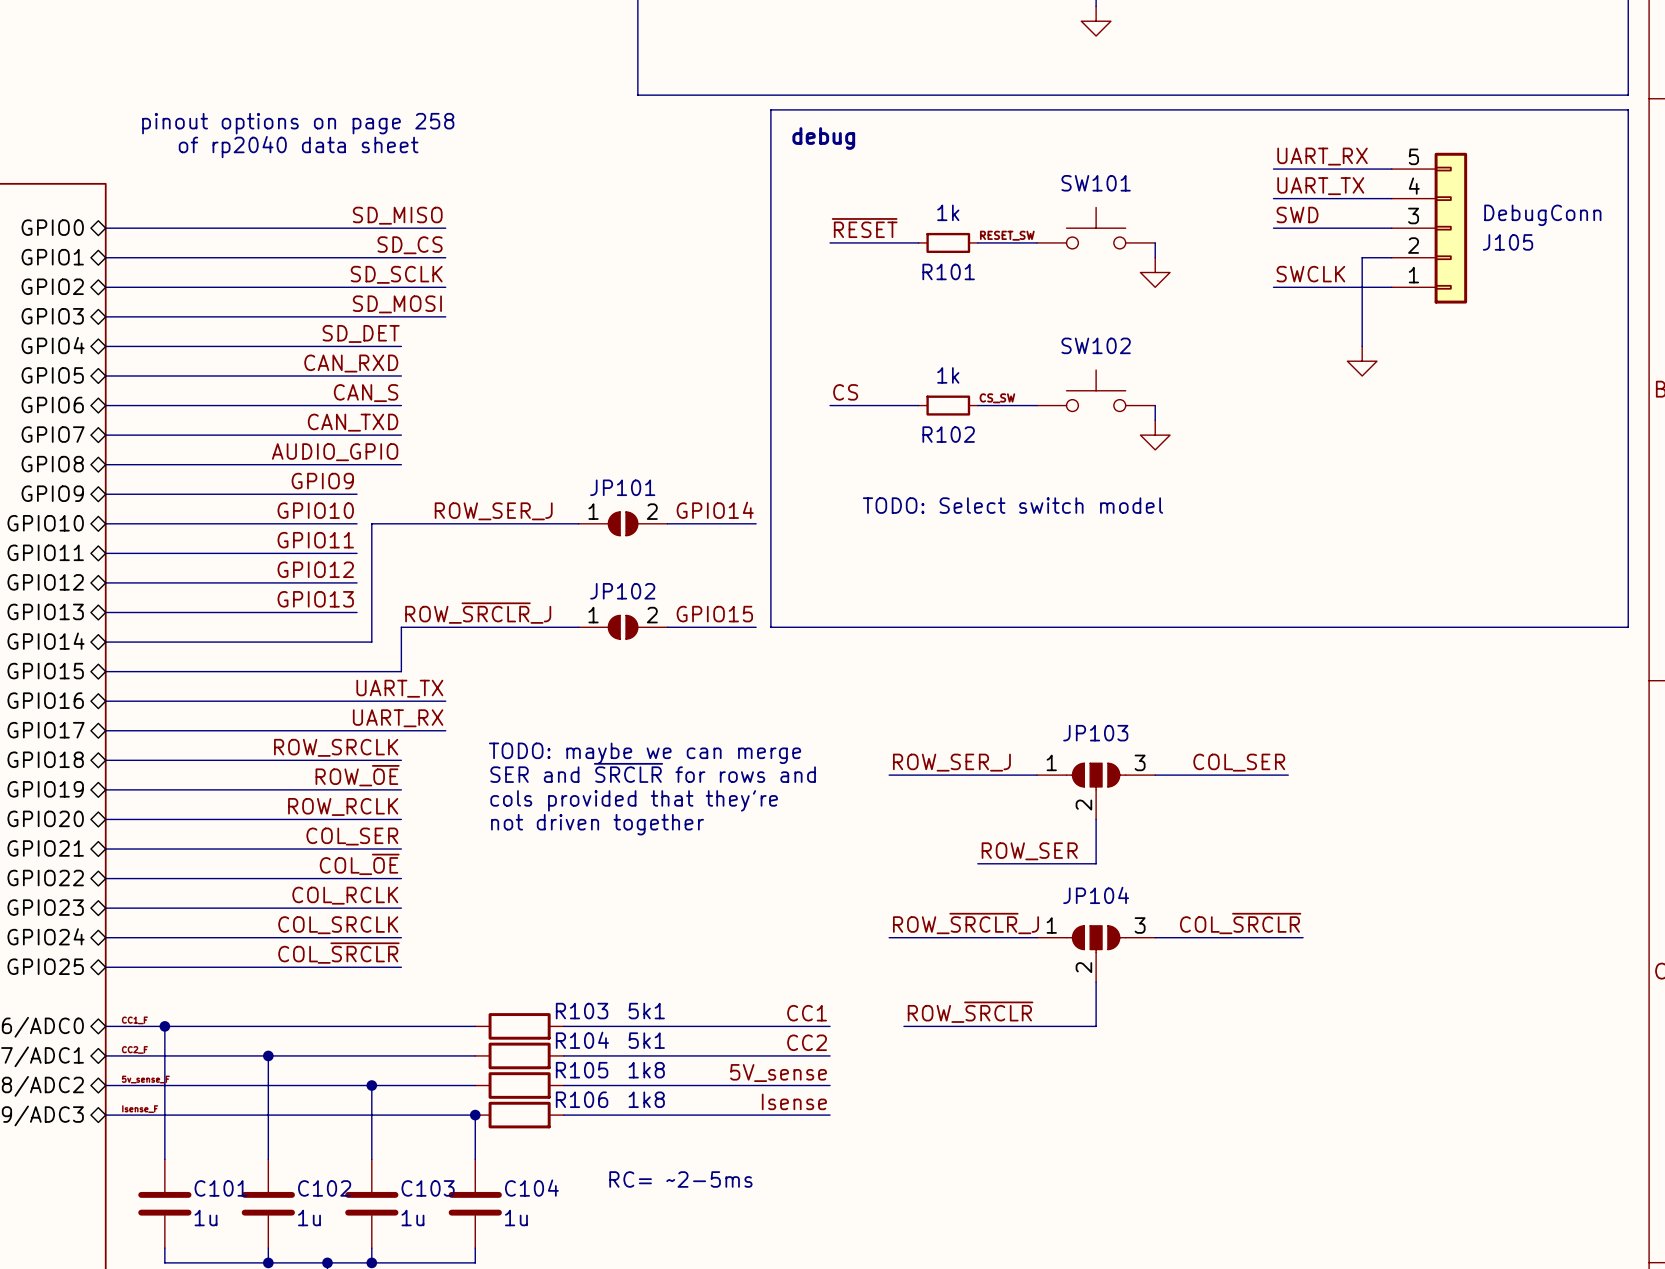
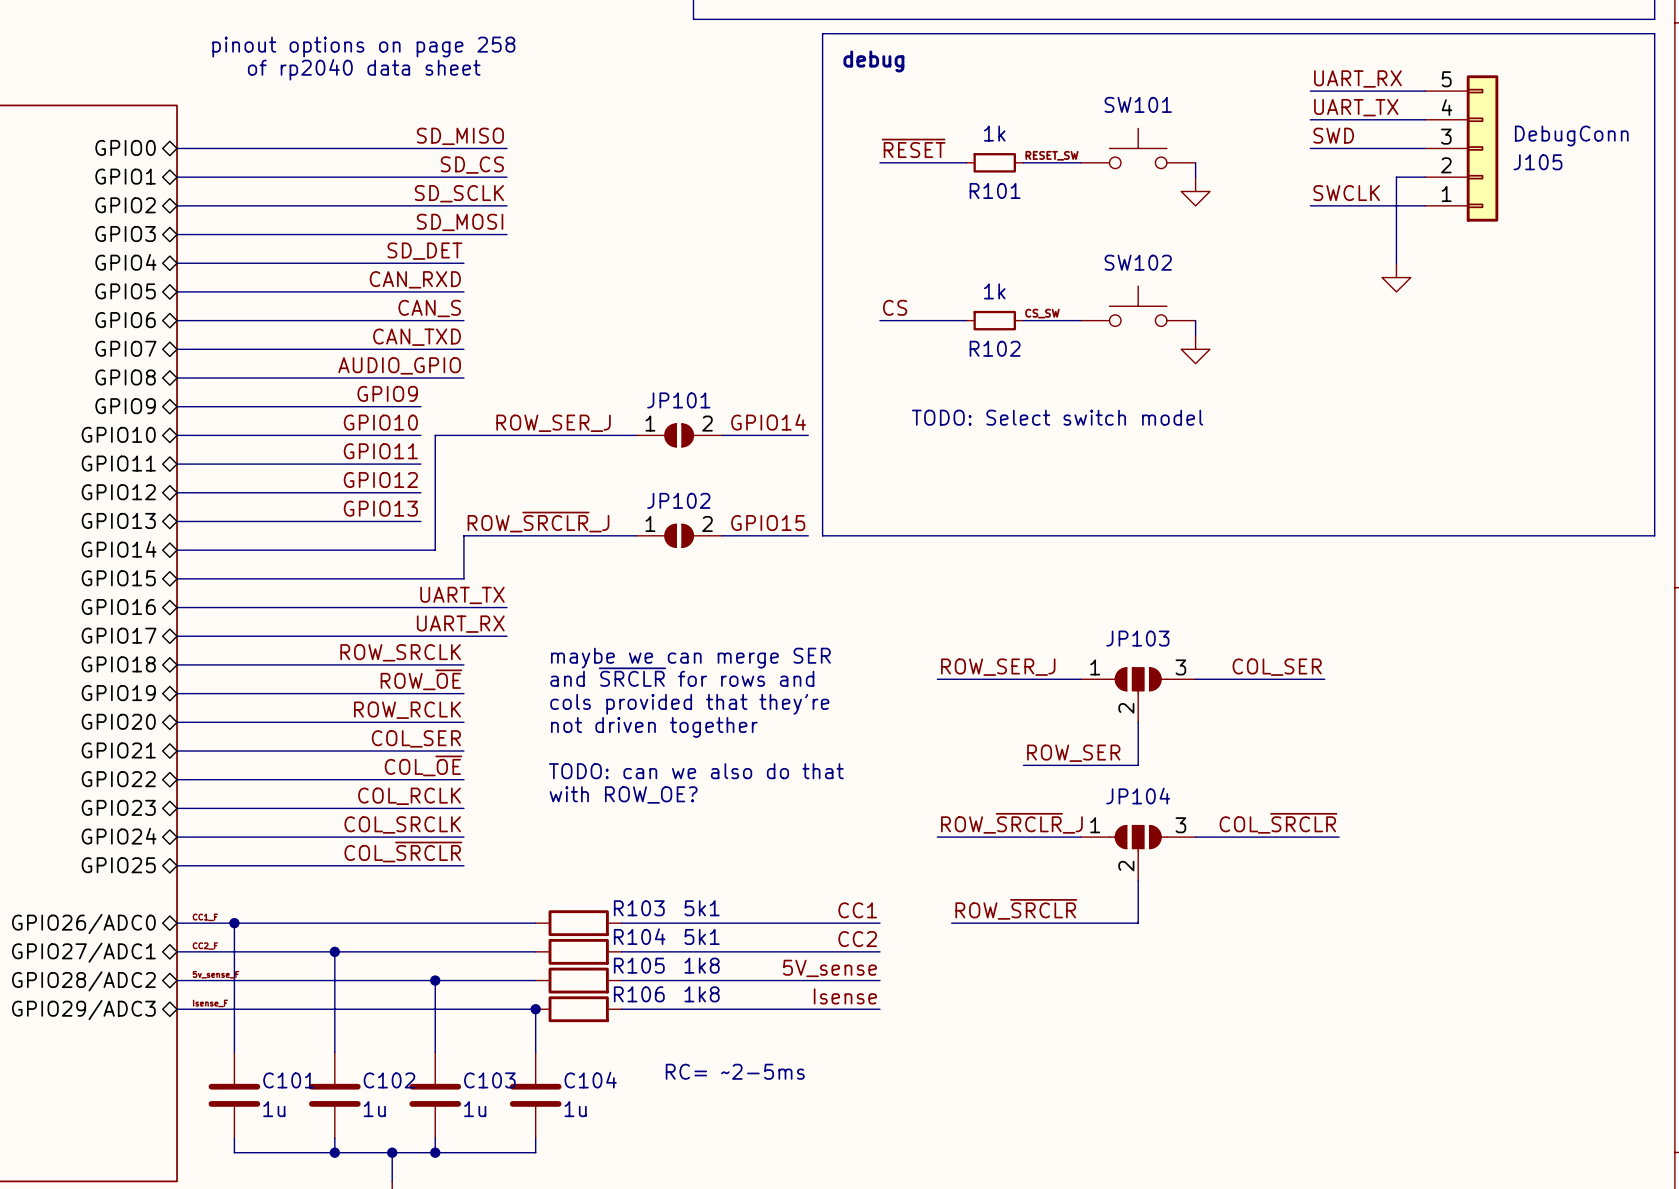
text: TODO: maybe we can merge (645, 753) -> maybe we can merge SER (690, 658)
text: SER and ~{SRCLR} for rows and (653, 772) -> and ~{SRCLR} for rows and (682, 677)
text: none -> TODO: can we also do that (696, 771)
text: none -> with ROW_OE? (623, 794)

